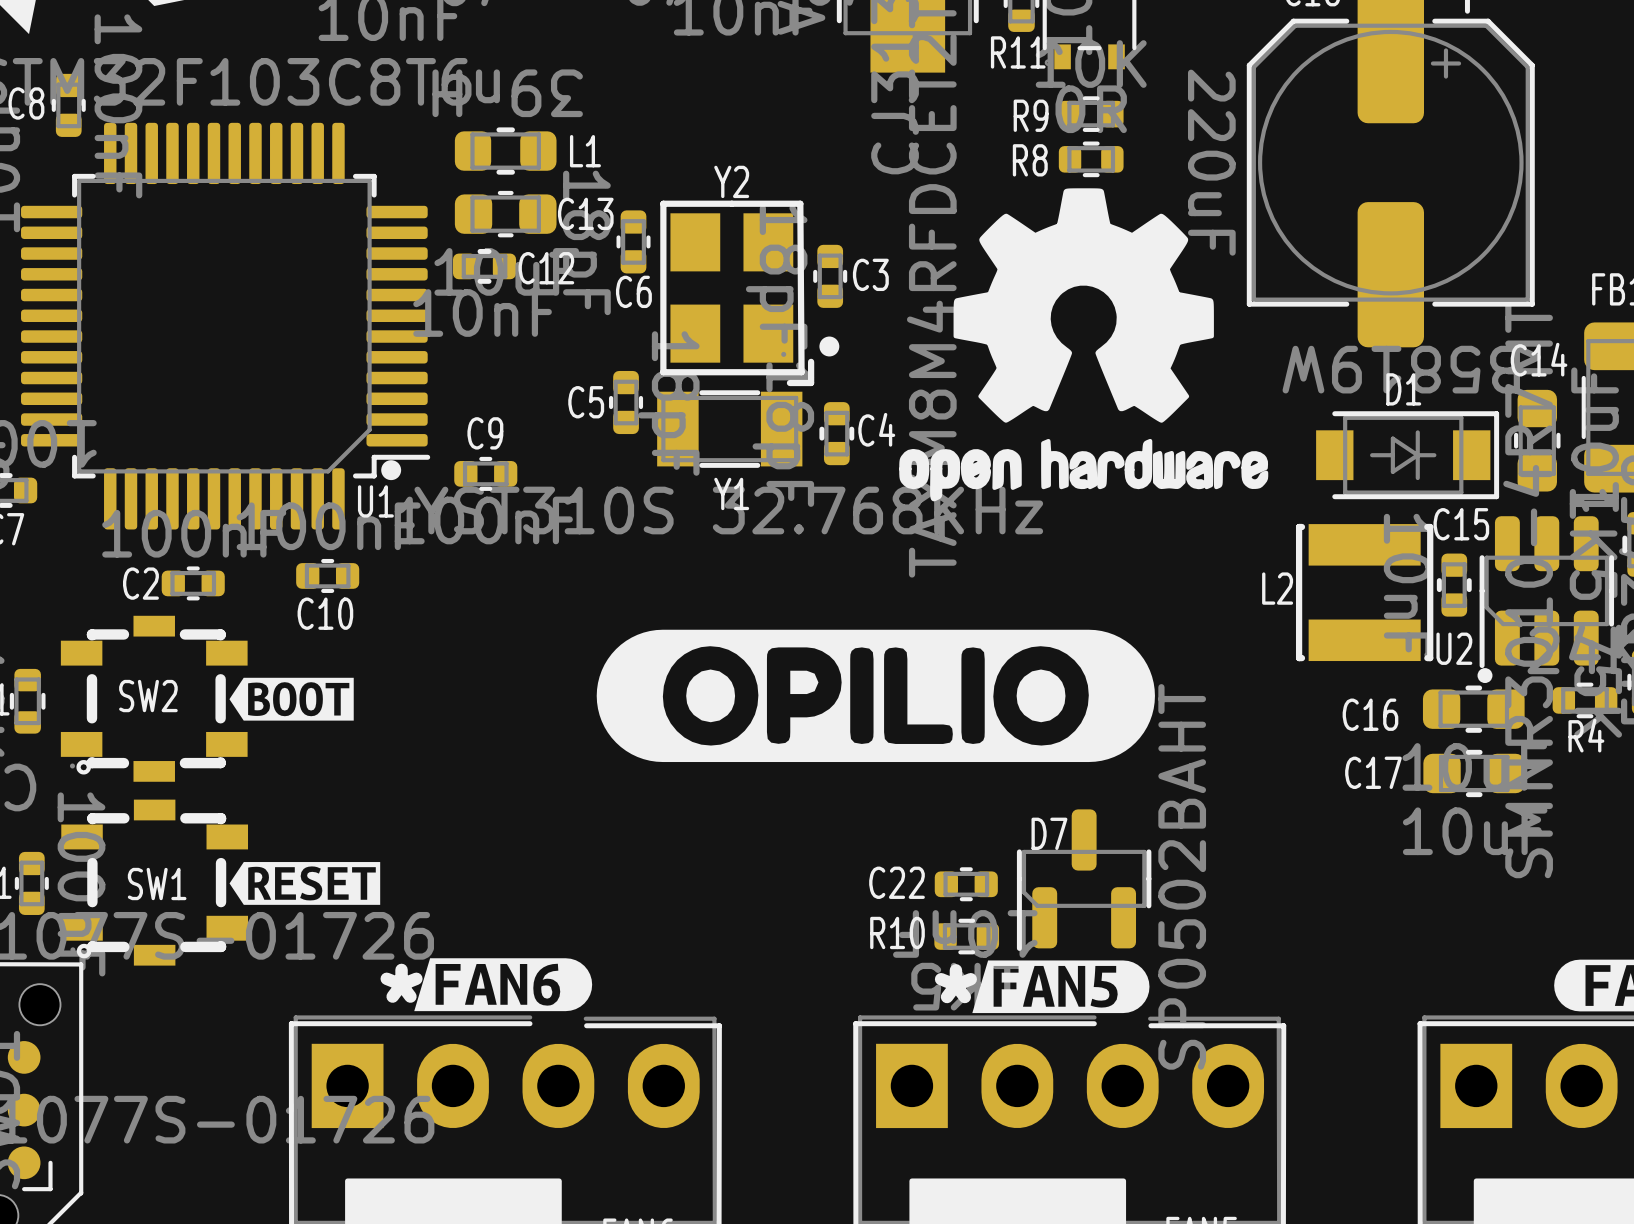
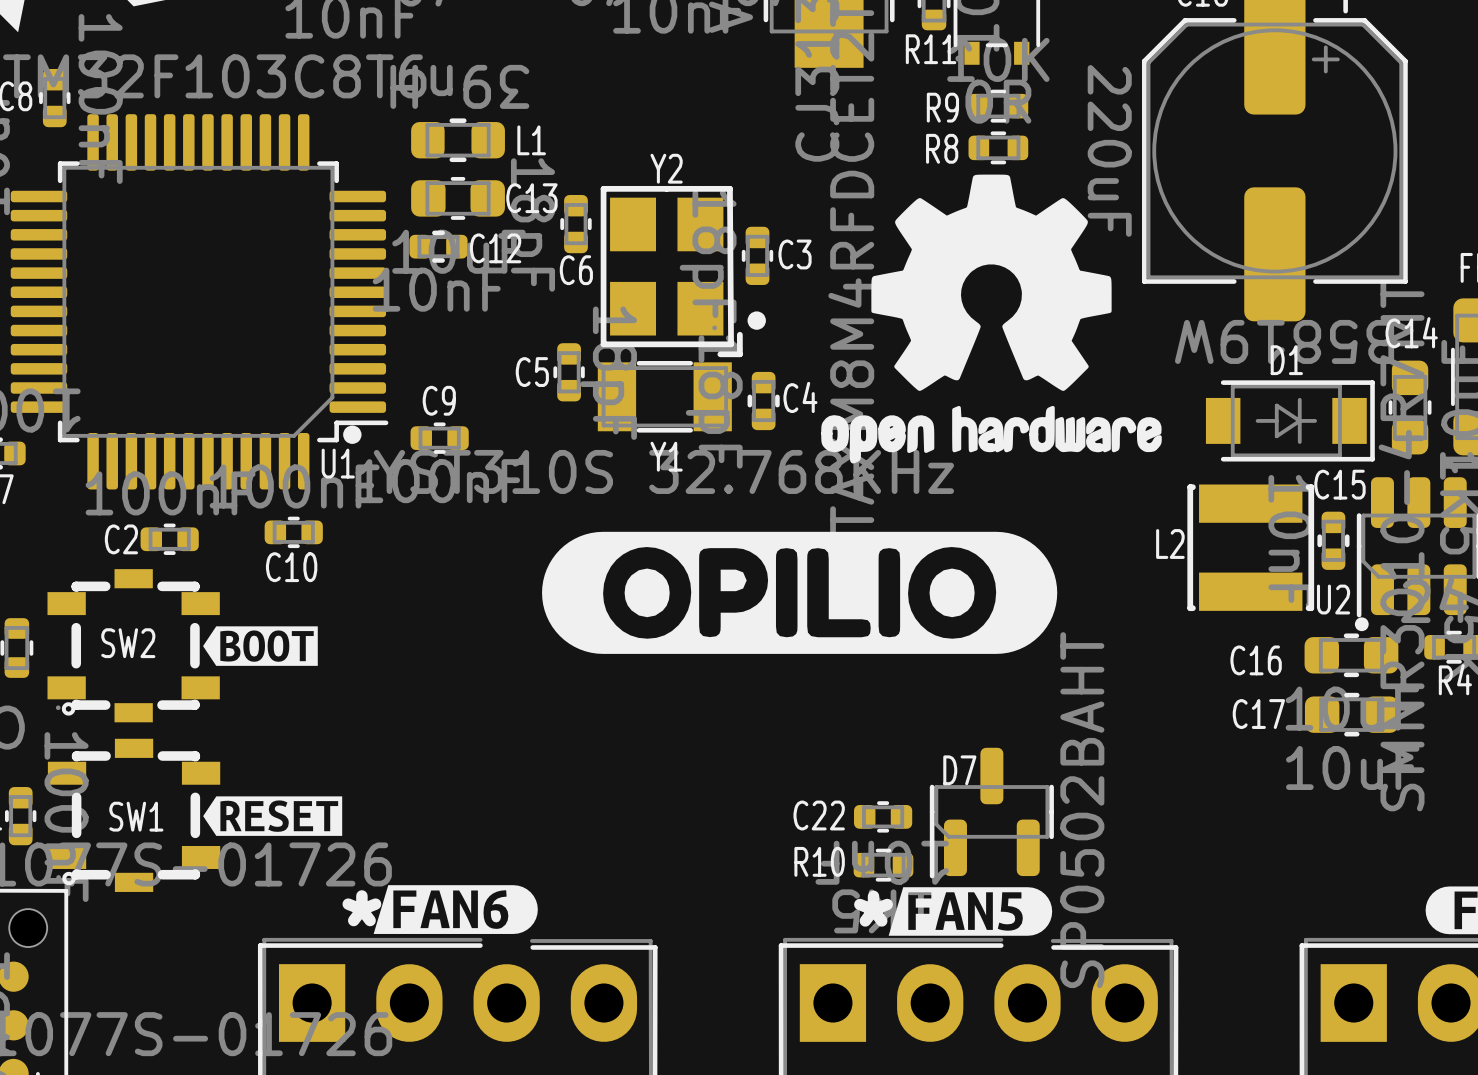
drawing position: (875, 695) -> (799, 592)

